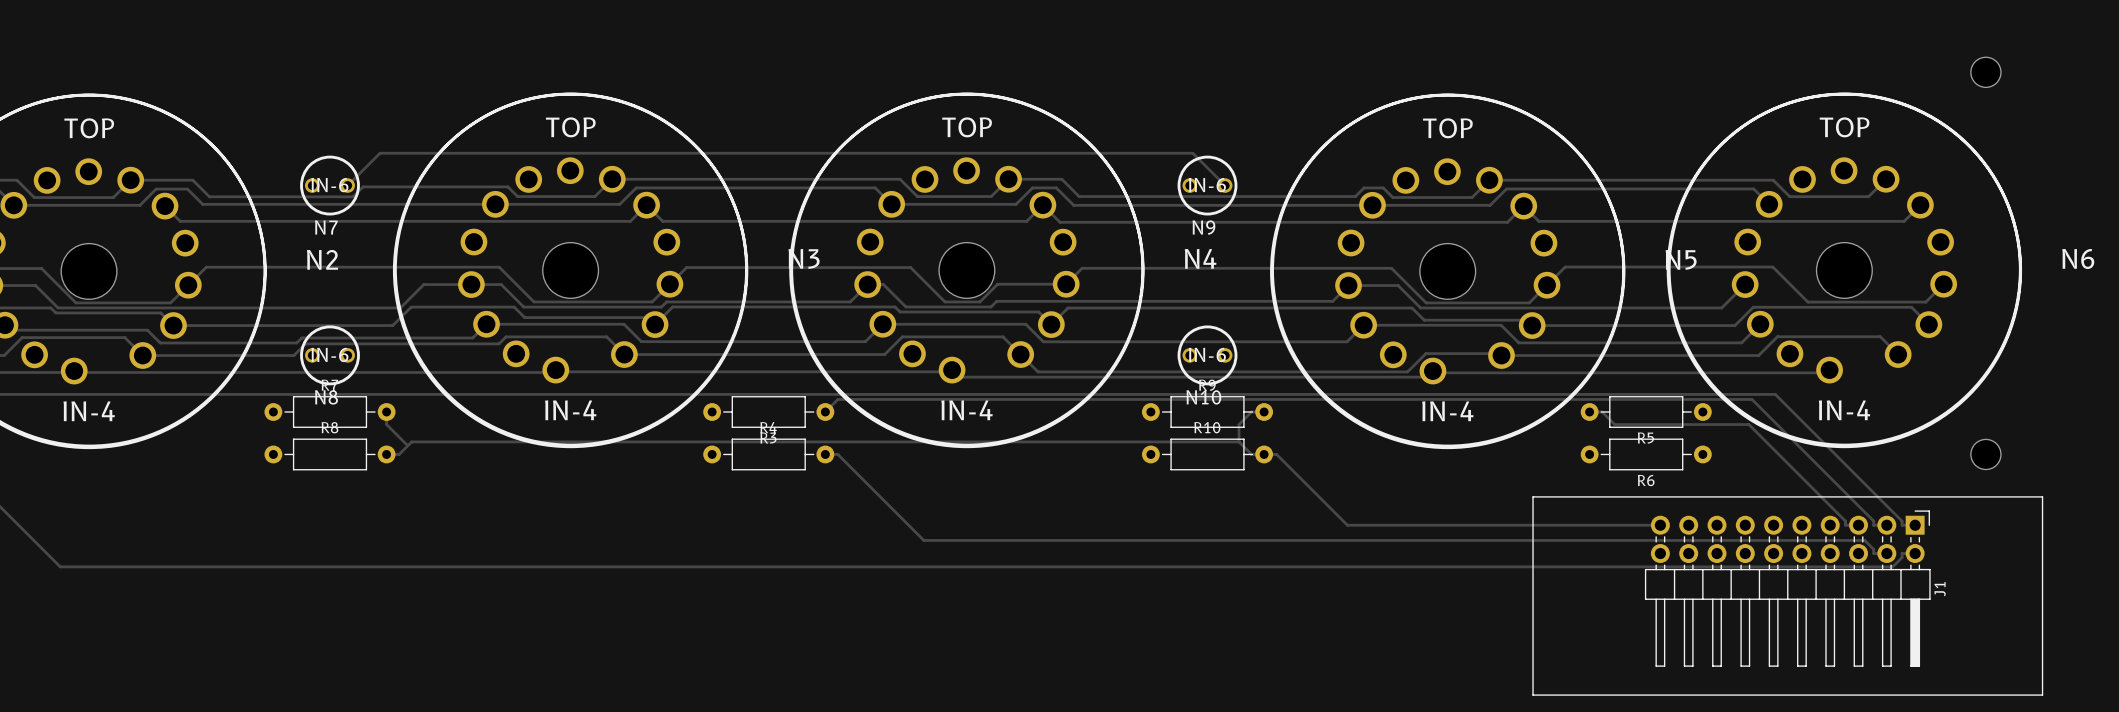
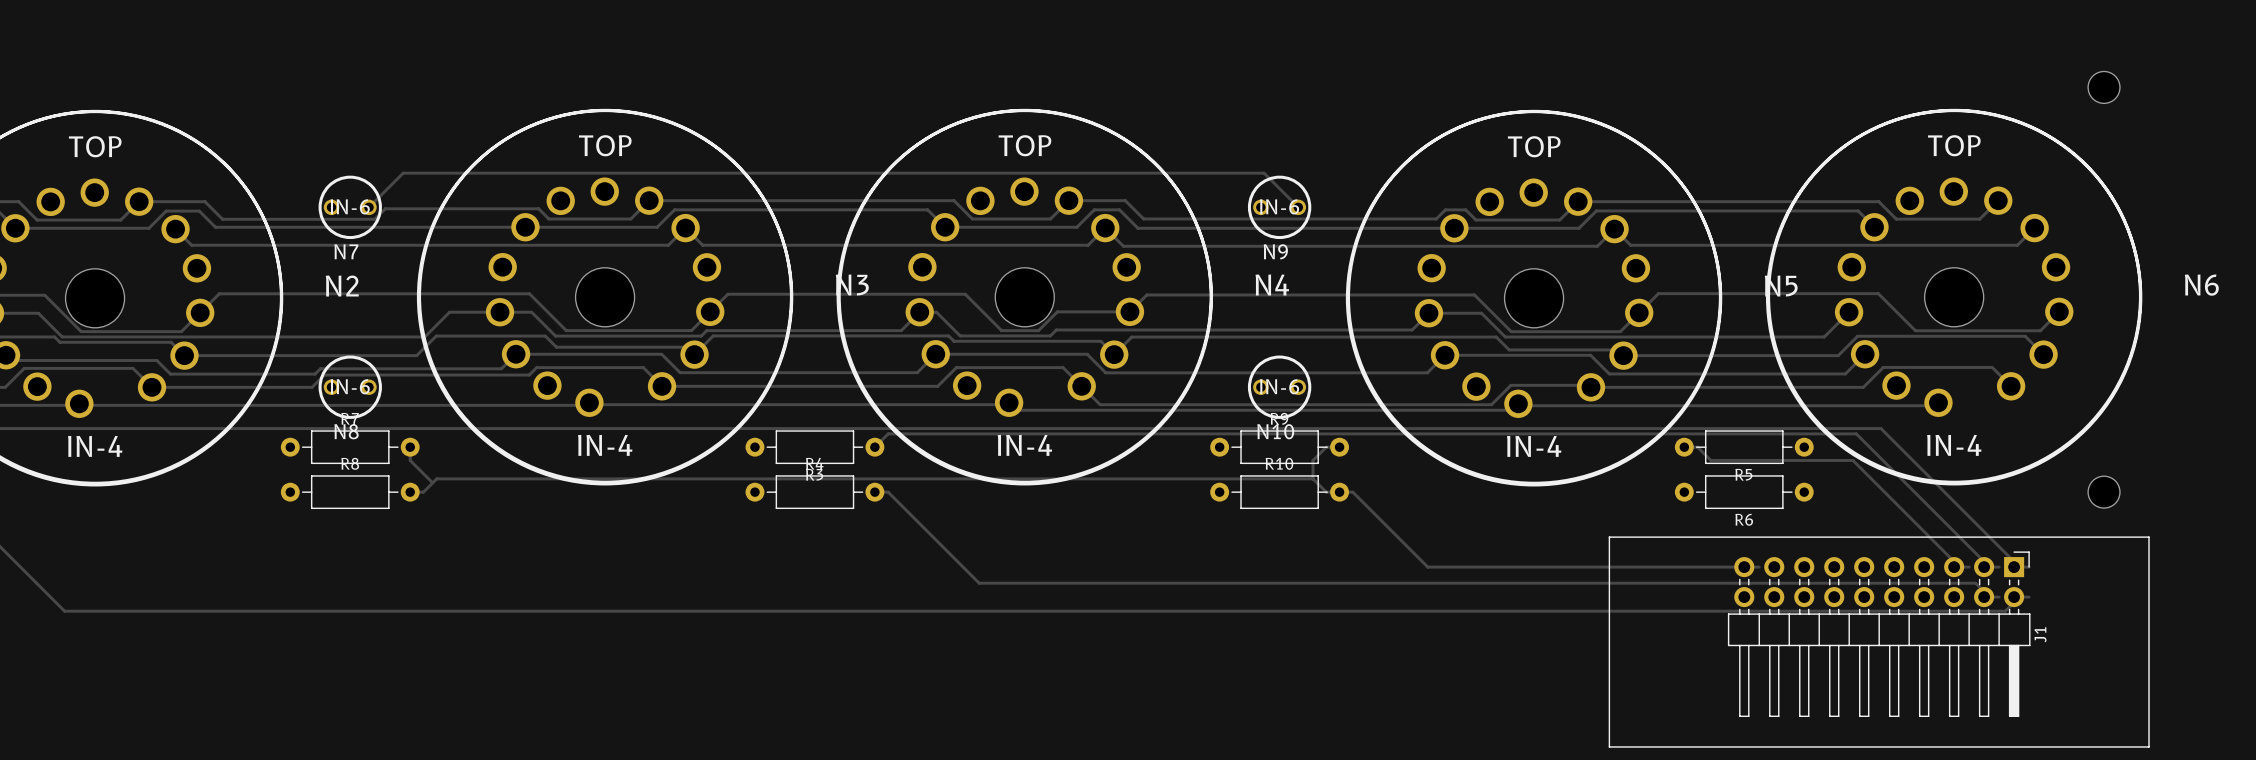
J1 position: (1787, 595) -> (1879, 642)

